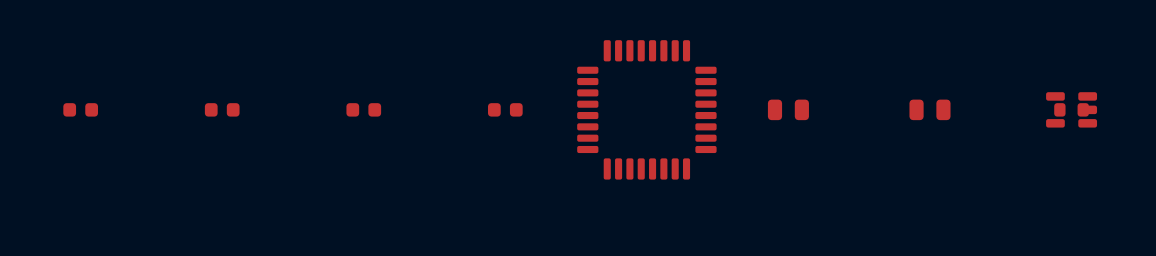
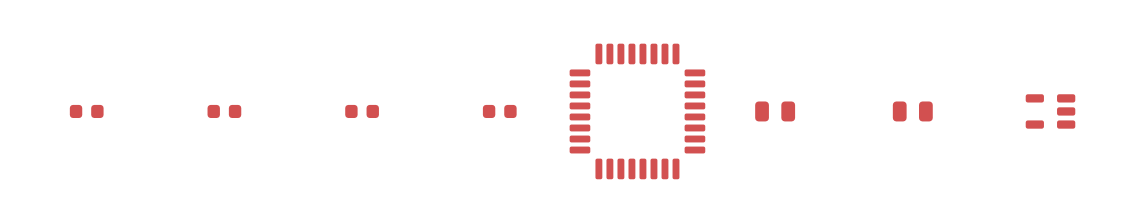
part: (1071, 109) -> none

